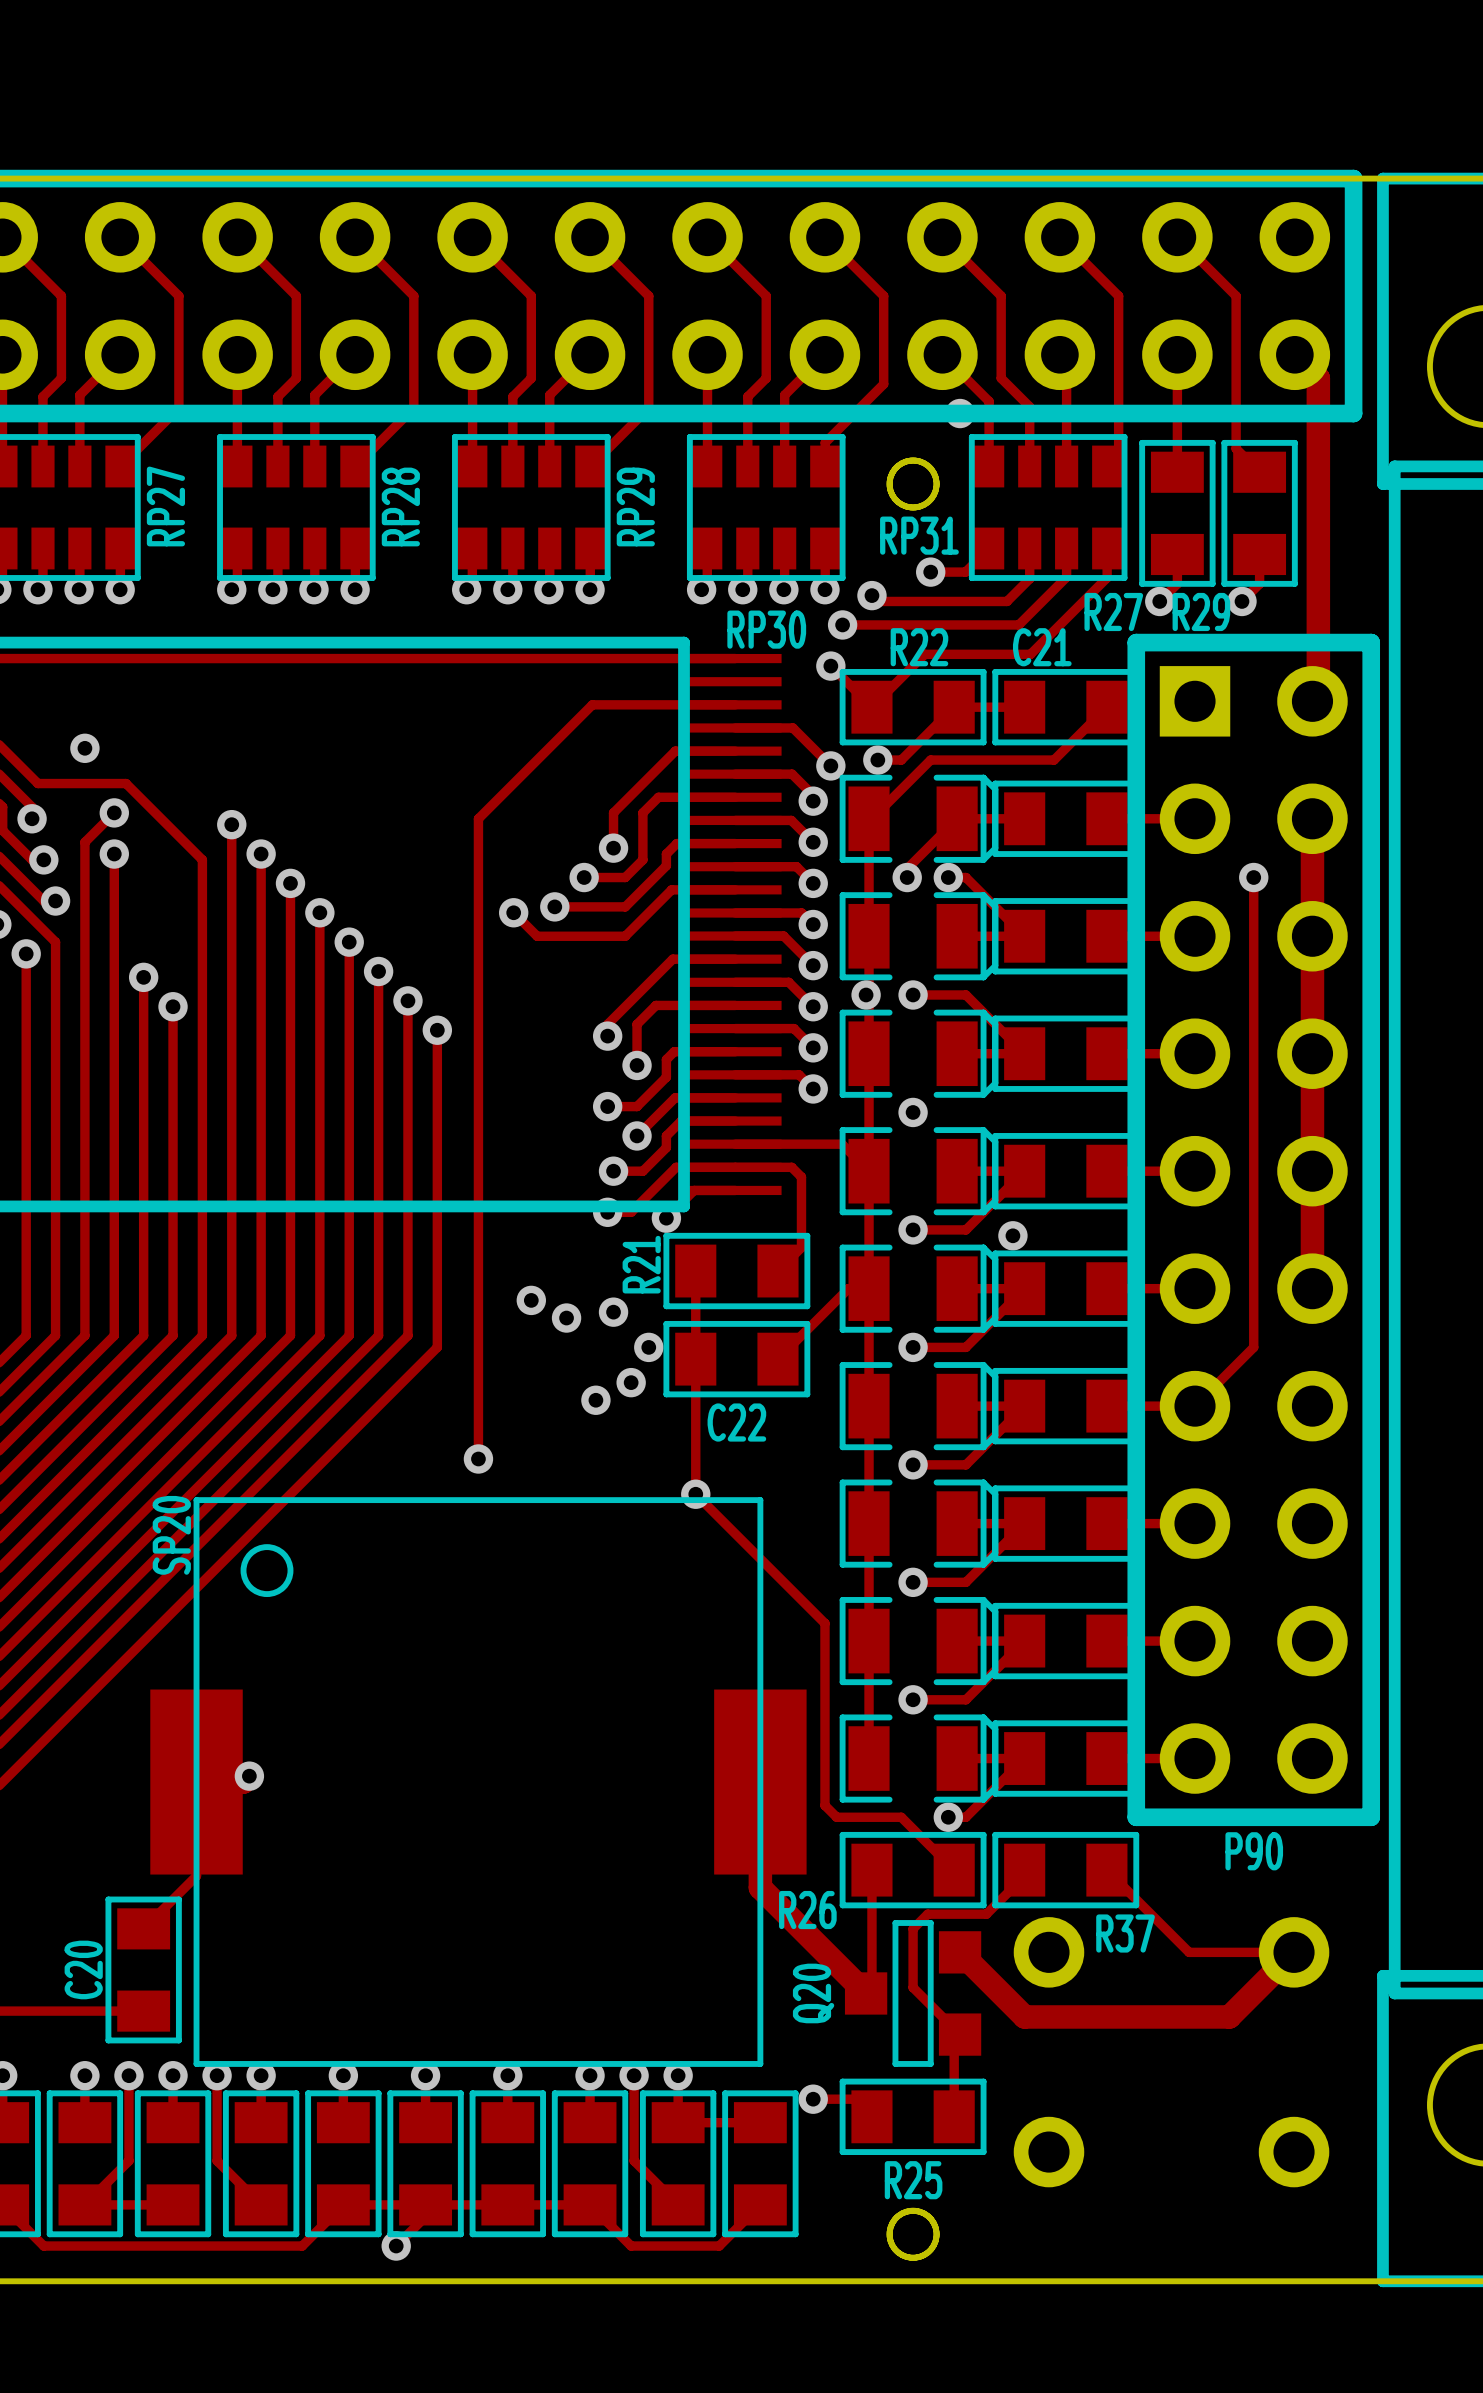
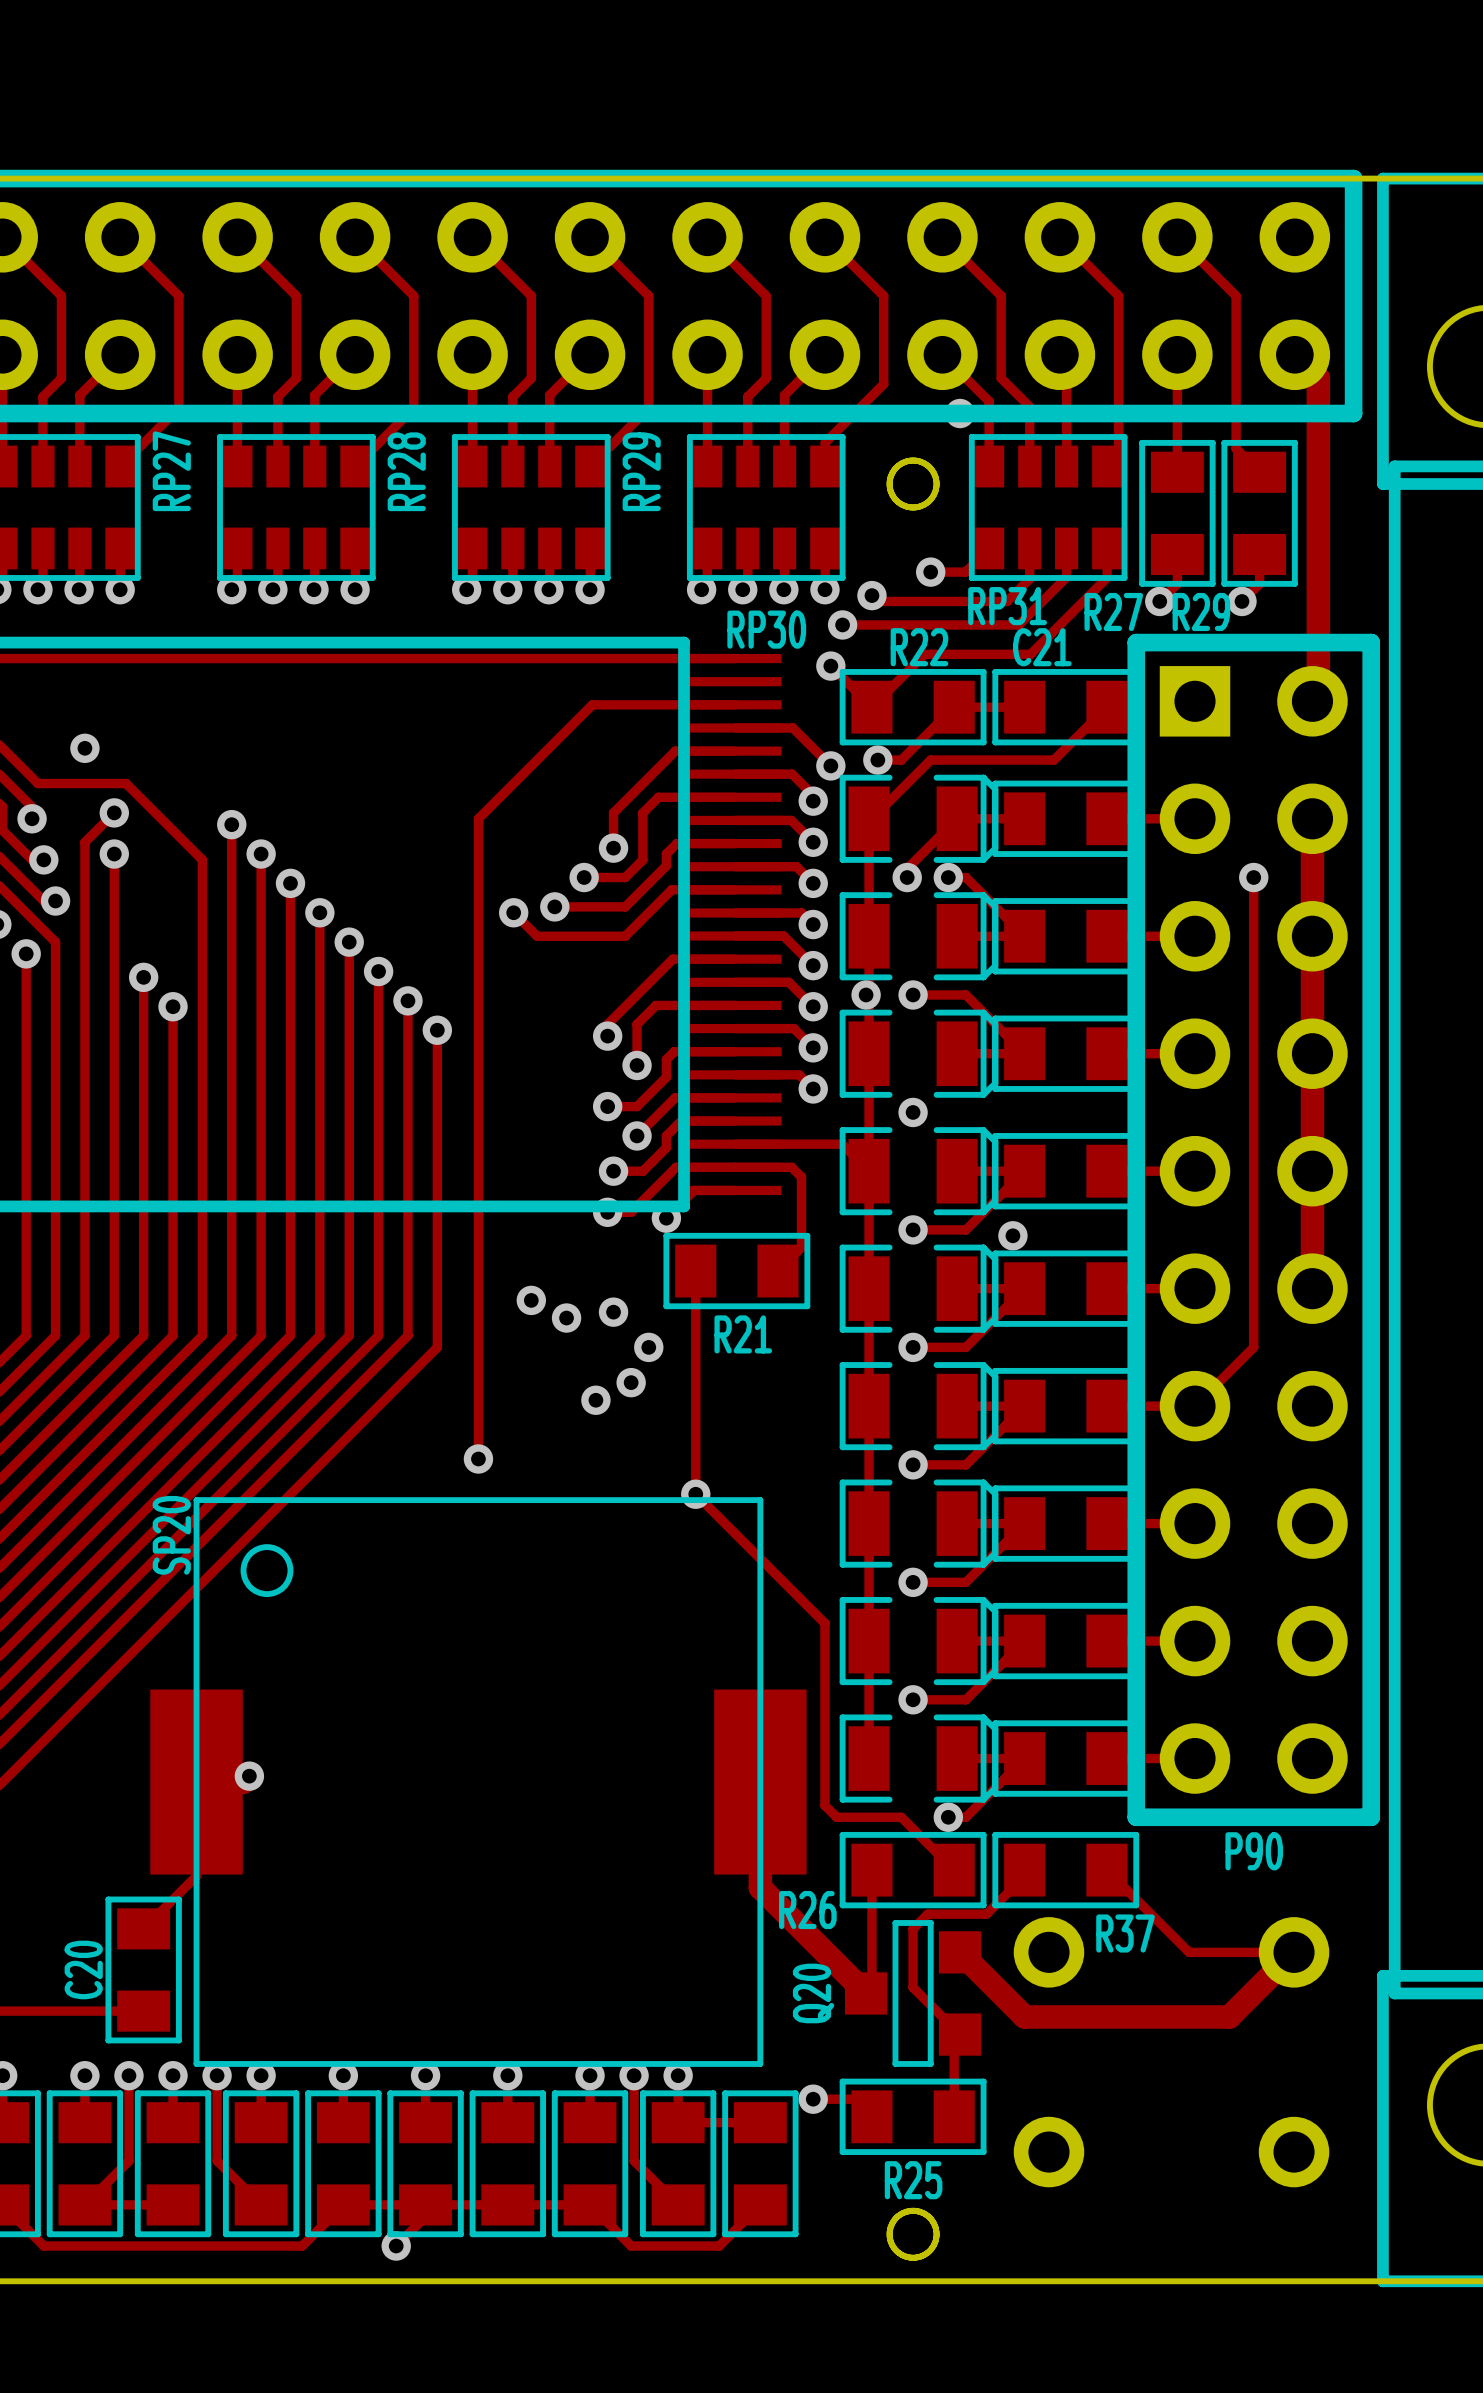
RP27 name position: RP27 (165, 506) -> RP27 (171, 471)
RP28 name position: RP28 (400, 506) -> RP28 (406, 471)
RP29 name position: RP29 (635, 506) -> RP29 (641, 471)
RP31 name position: RP31 (919, 535) -> RP31 (1007, 606)
R21 name rotation: 0° (641, 1264) -> 90° clockwise (743, 1334)
R21 name position: R21 (641, 1264) -> R21 (743, 1334)
track: (869, 1288) (848, 1288) (777, 1359) -> none
C22: (736, 1359) -> none

